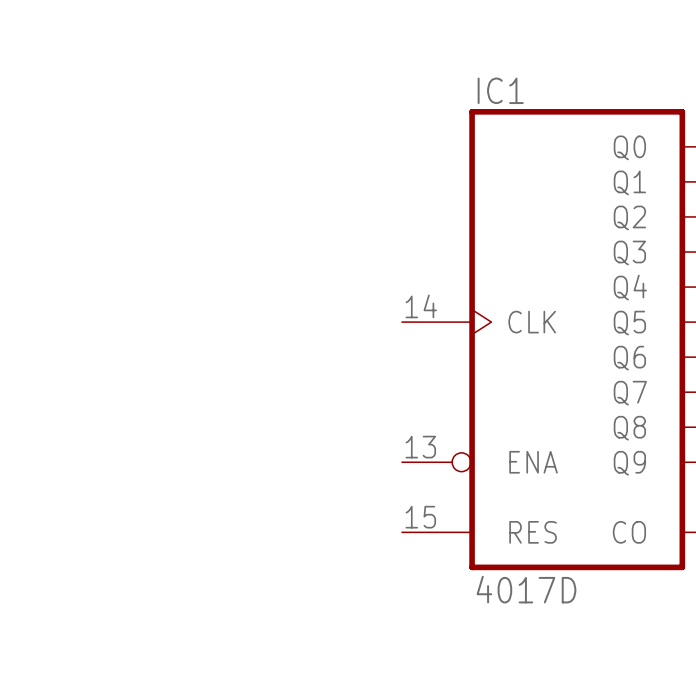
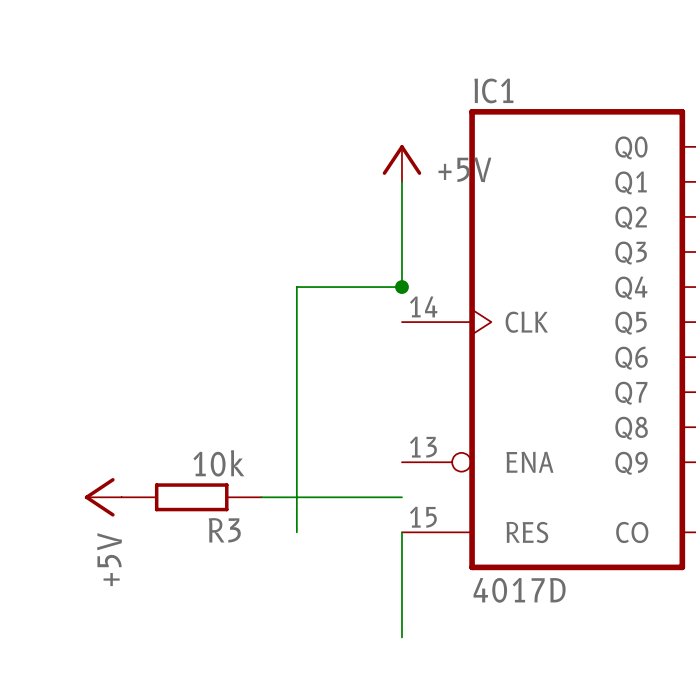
power symbol: none -> +5V (401, 163)
wire: none -> (401, 181) (401, 287) (296, 287) (296, 532)
junction: none -> (401, 287)
power symbol: none -> +5V (103, 497)
R3: none -> 10k (191, 497)
wire: none -> (261, 497) (401, 497)
wire: none -> (401, 532) (401, 637)

